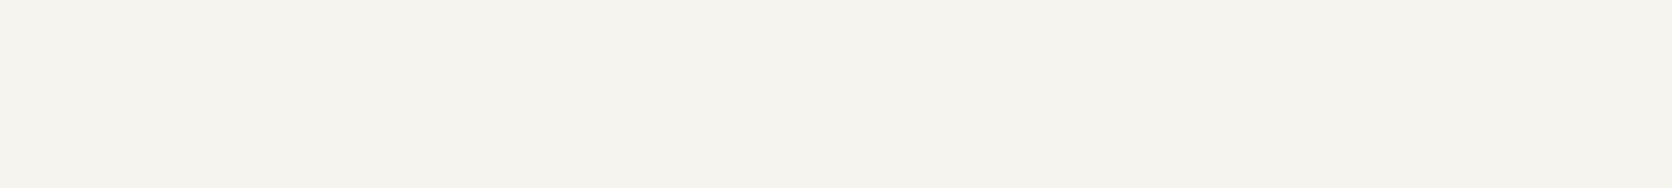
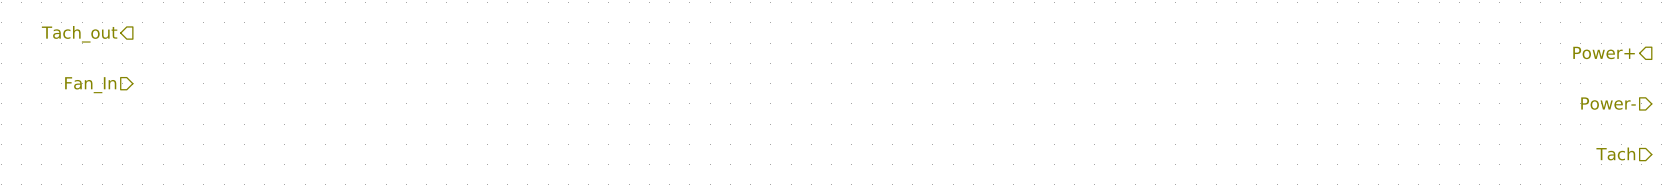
hierarchical label: none -> Tach_out (79, 34)
hierarchical label: none -> Power+ (1604, 52)
hierarchical label: none -> Fan_In (90, 85)
hierarchical label: none -> Power- (1608, 103)
hierarchical label: none -> Tach (1615, 153)

